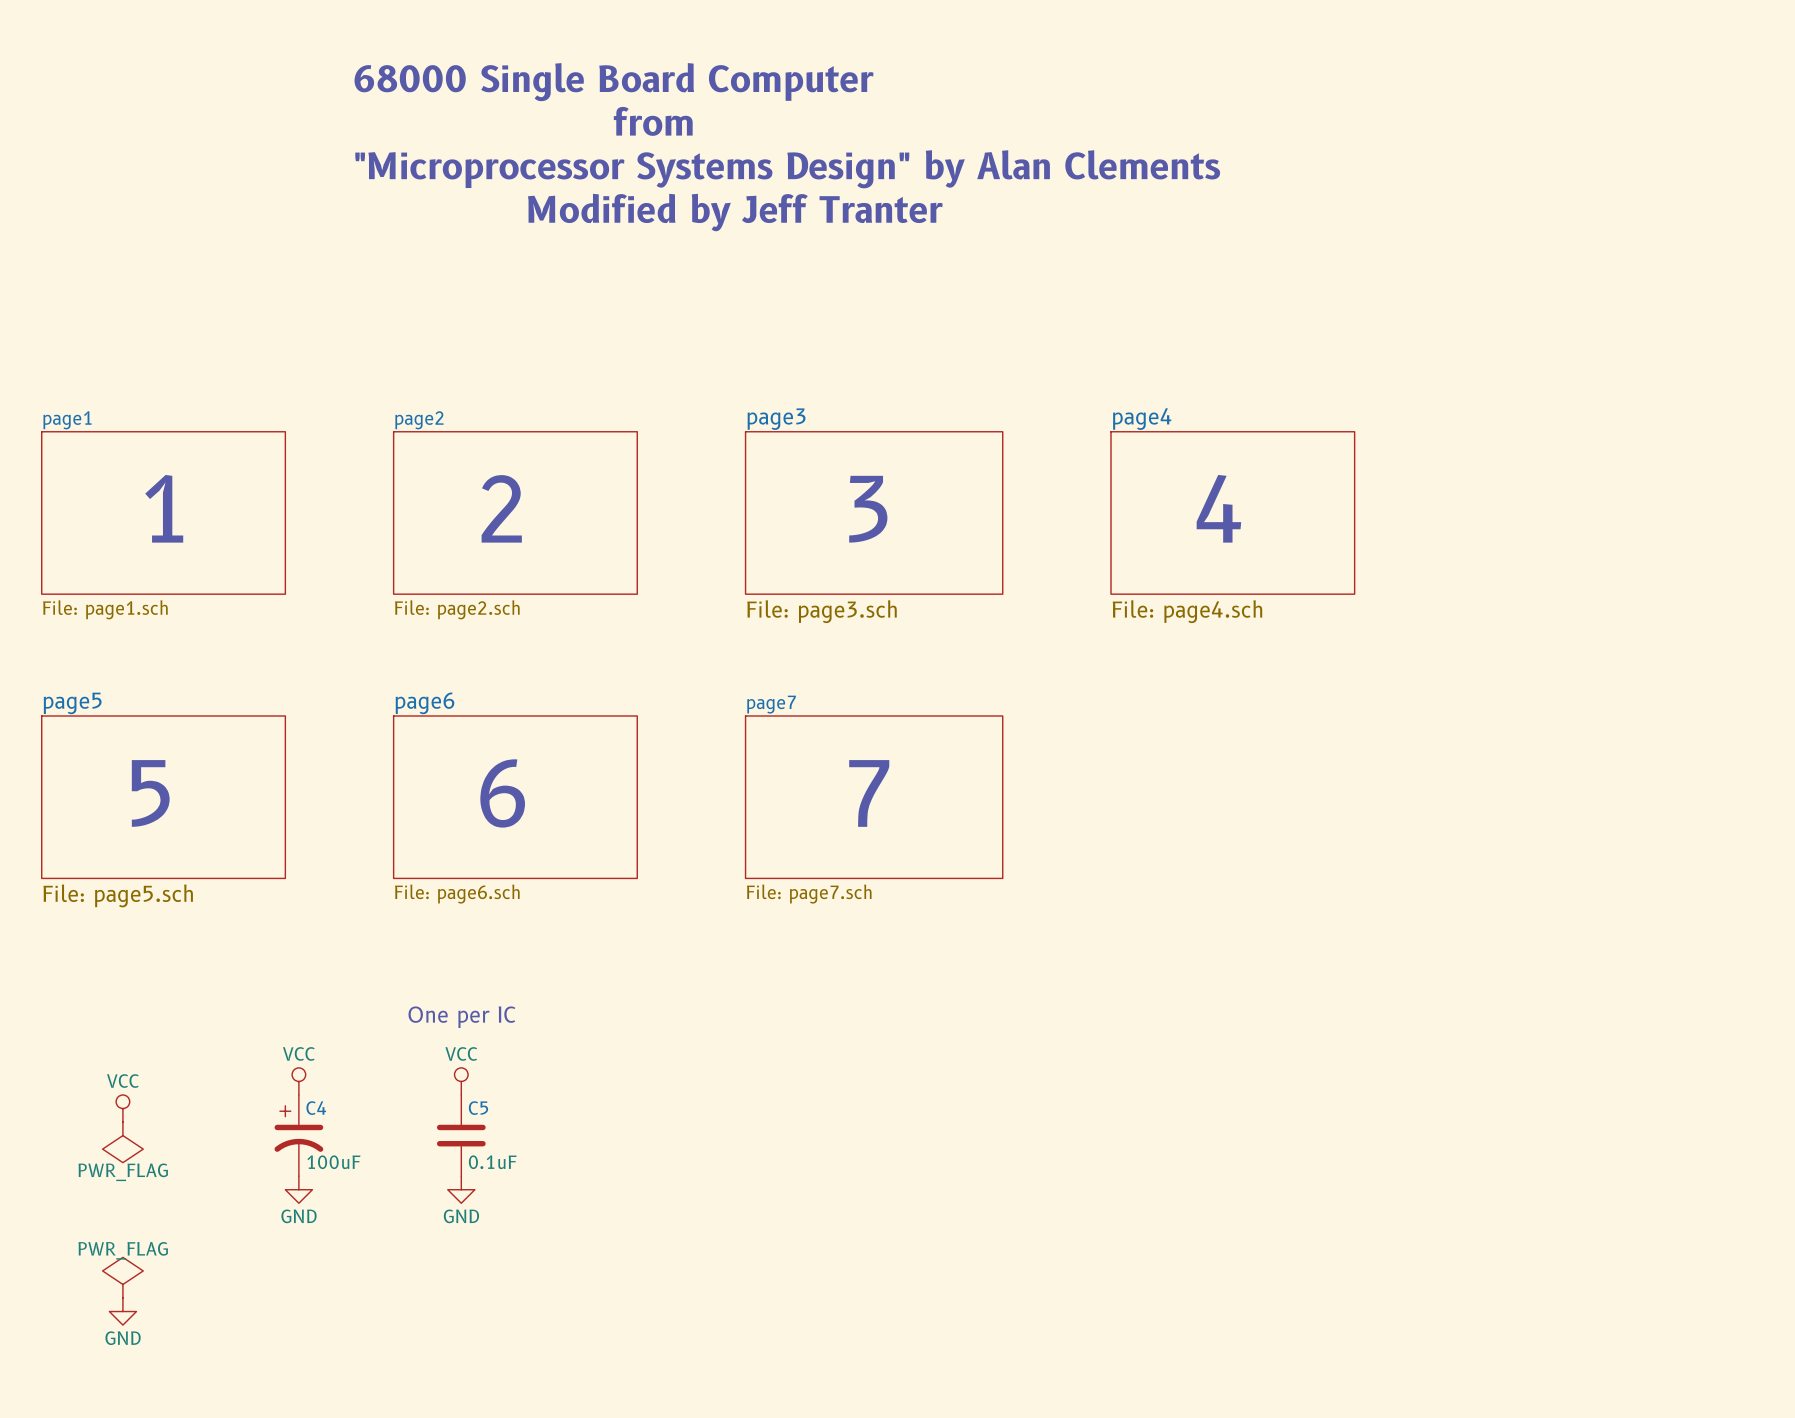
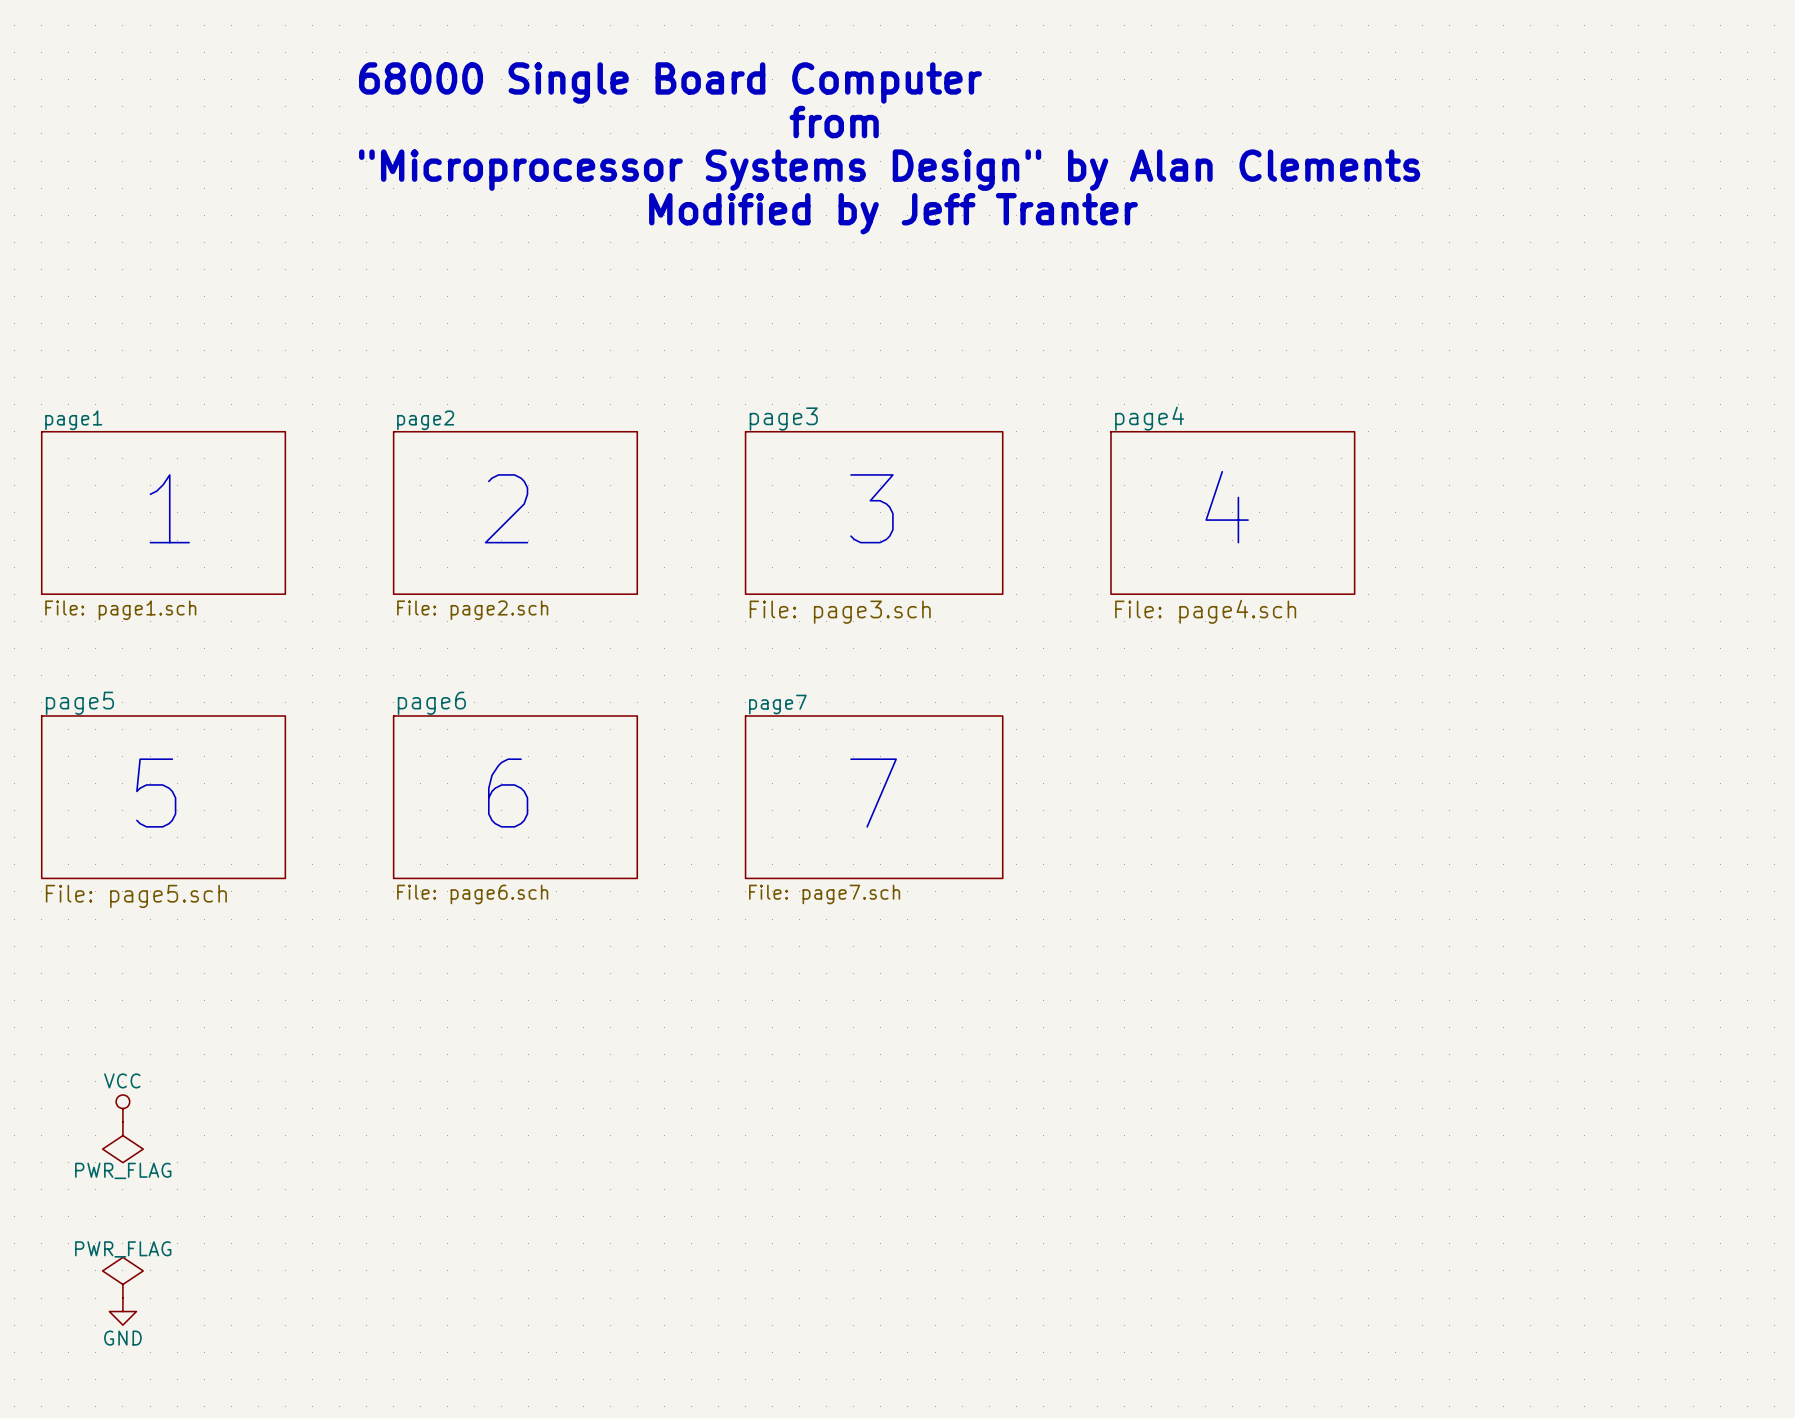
text: One per IC (461, 1017) -> none
power symbol: VCC (298, 1081) -> none
power symbol: VCC (461, 1081) -> none
C4: 100uF (298, 1135) -> none
C5: 0.1uF (461, 1135) -> none
power symbol: GND (298, 1189) -> none
power symbol: GND (461, 1189) -> none

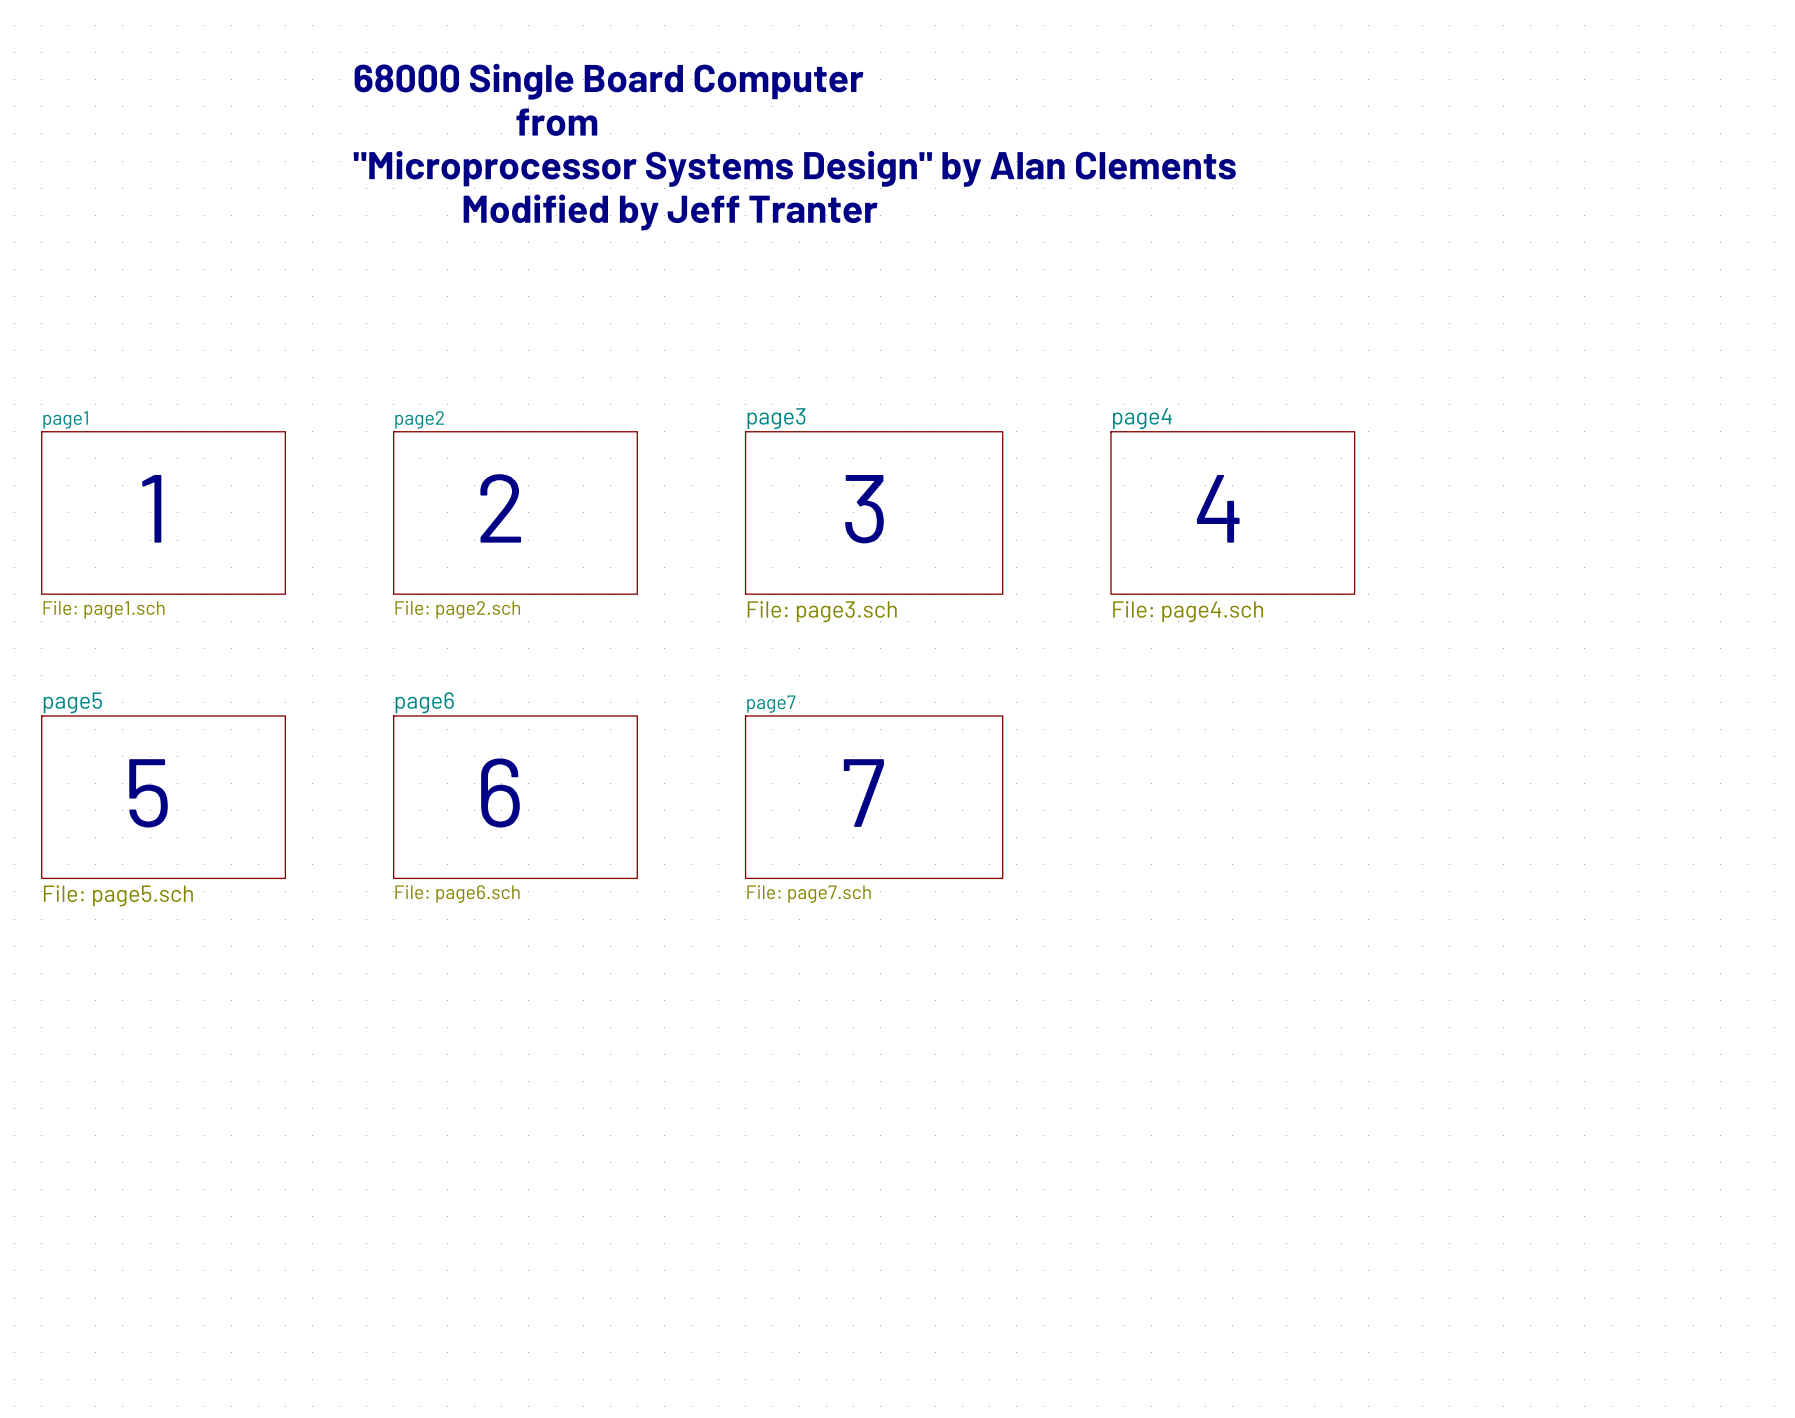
power symbol: VCC (122, 1108) -> none
power symbol: PWR_FLAG (122, 1142) -> none
power symbol: PWR_FLAG (122, 1277) -> none
power symbol: GND (122, 1311) -> none

